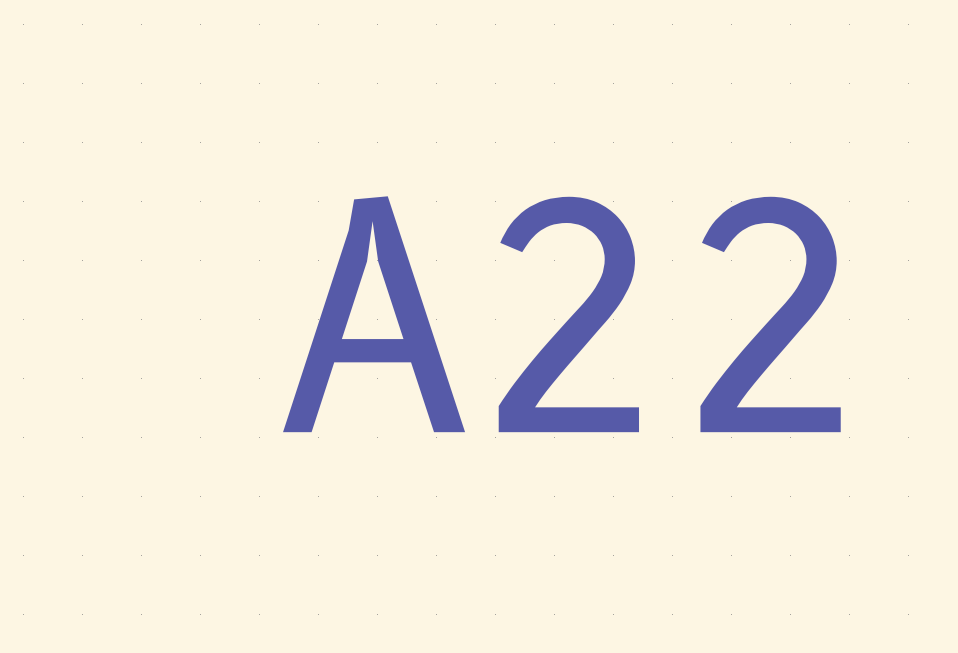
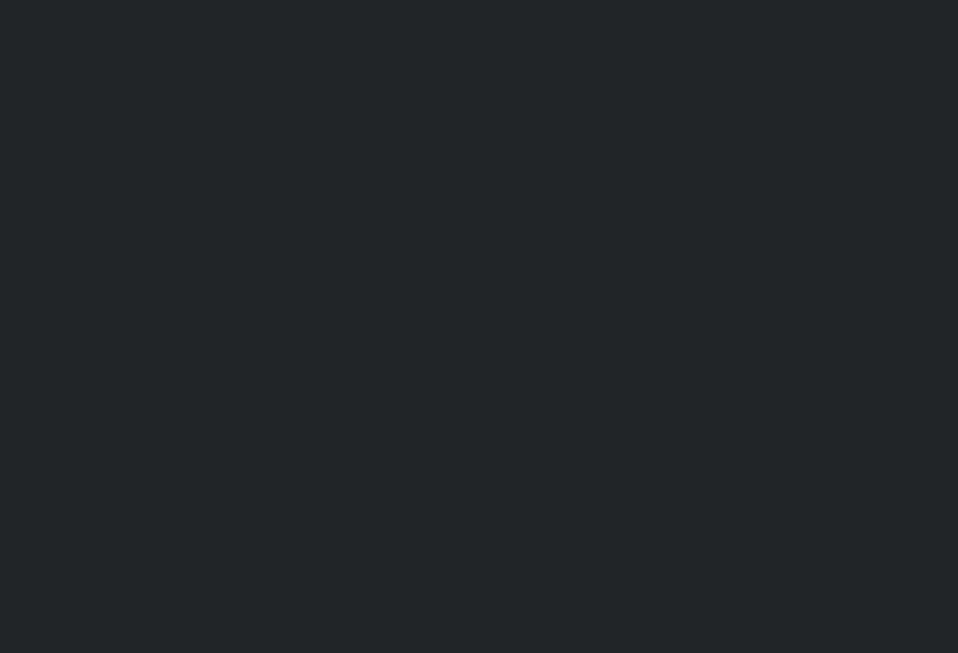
text: A22 (561, 314) -> none

